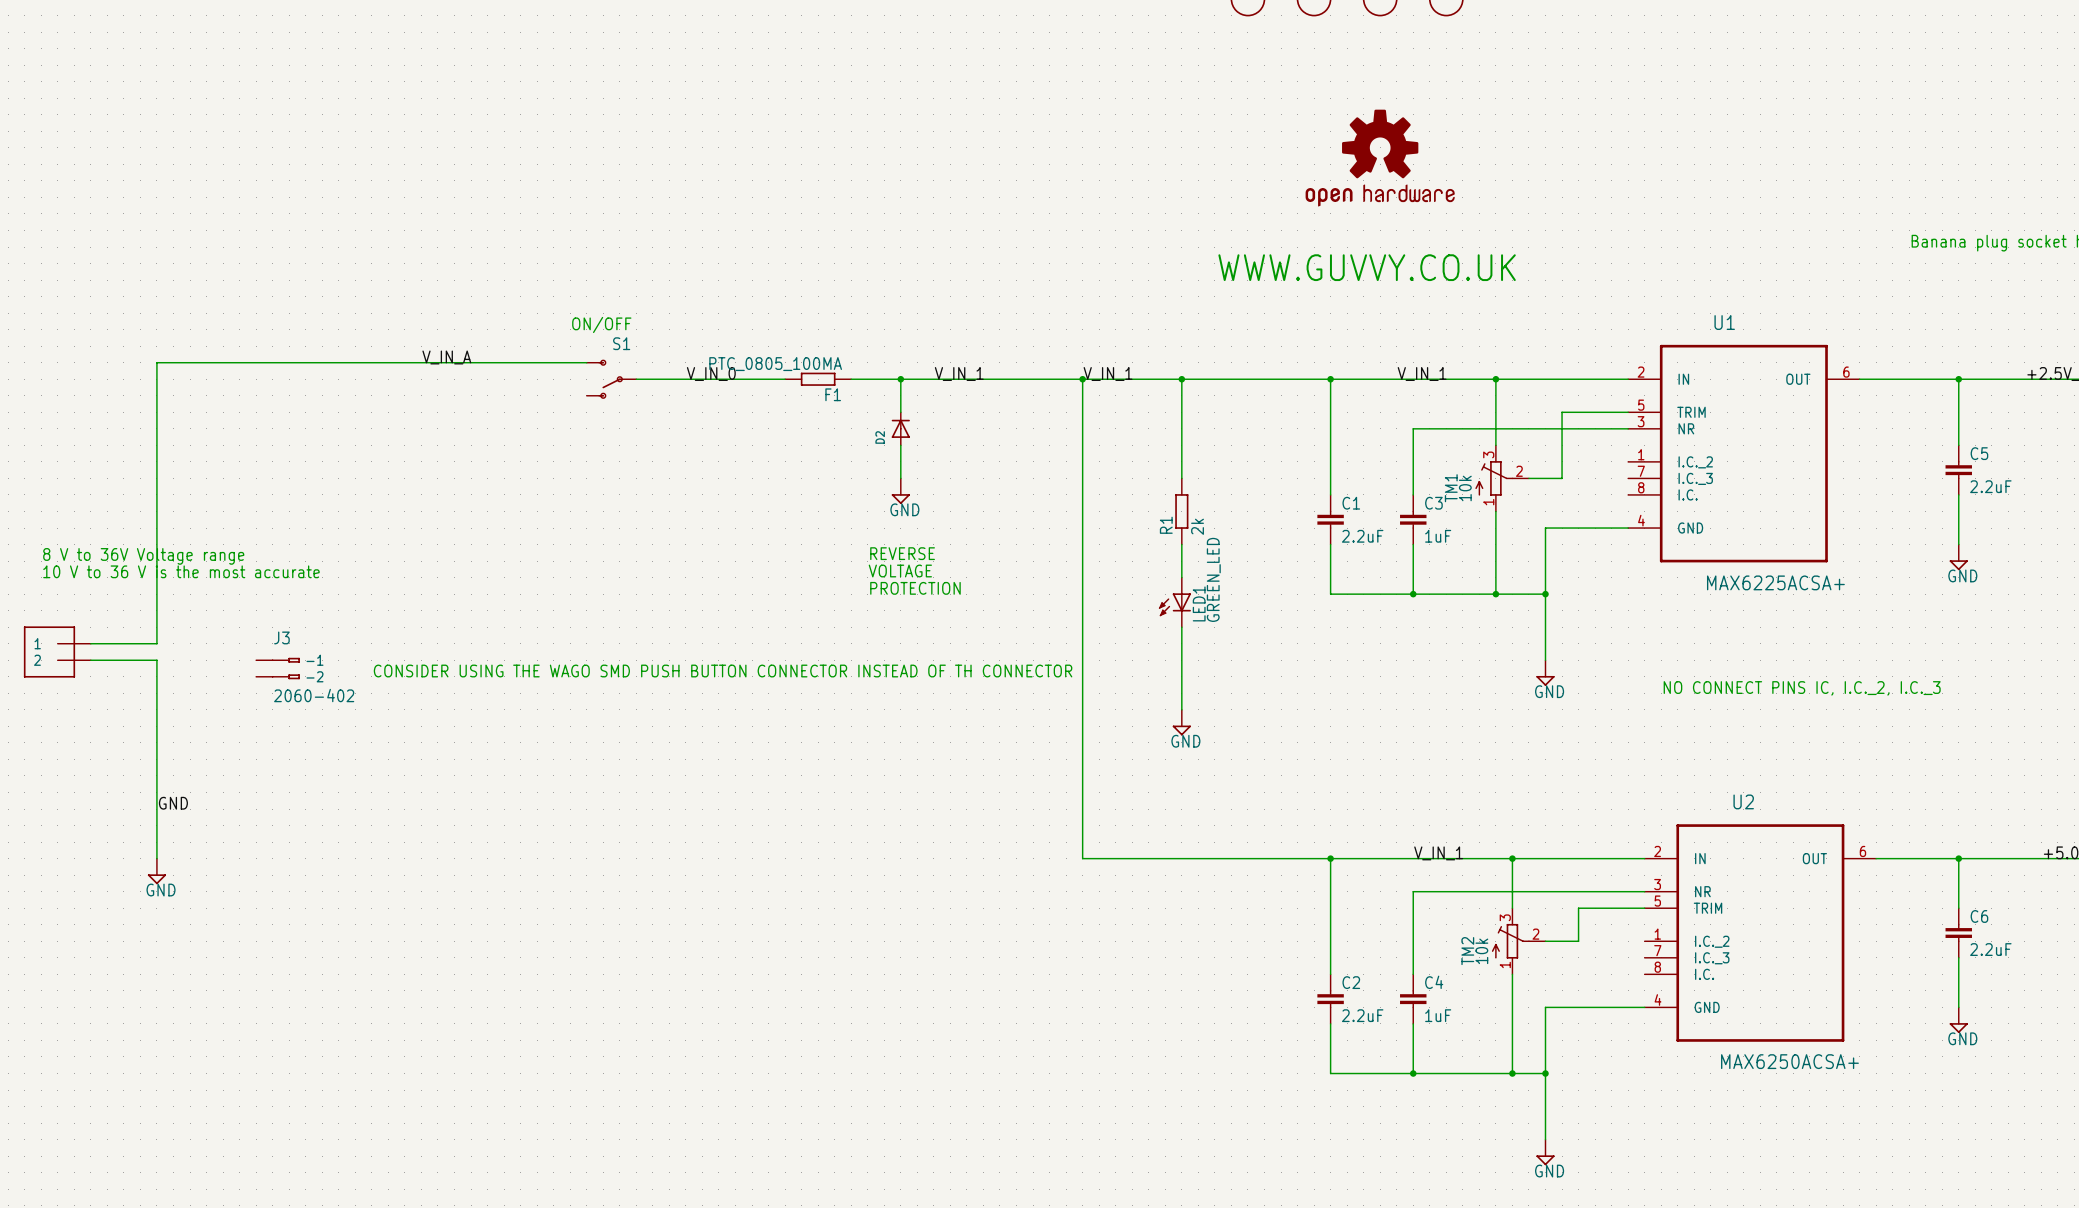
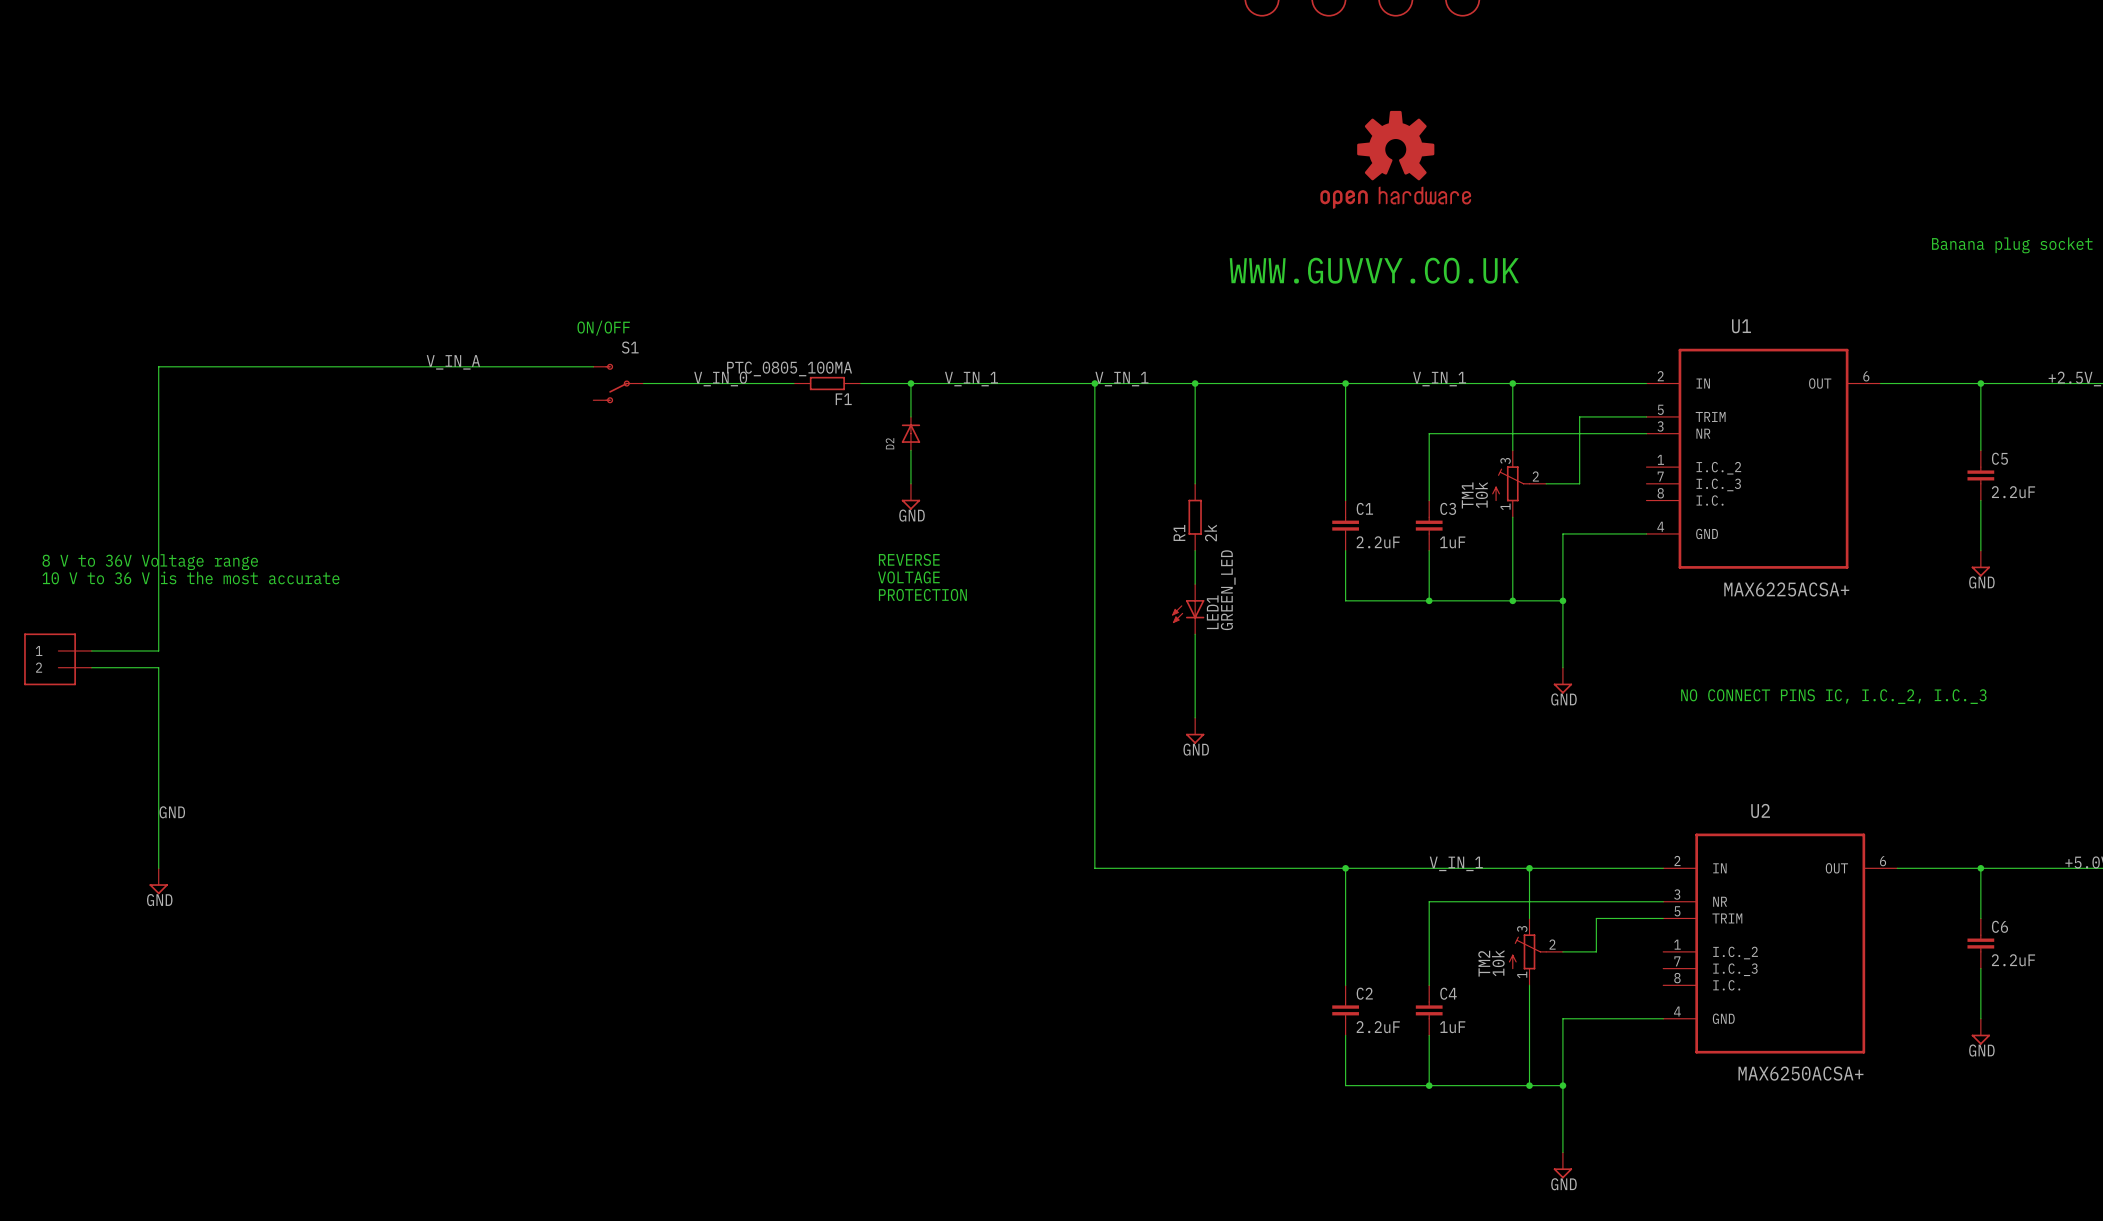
J3: 2060-402 (278, 668) -> none
text: CONSIDER USING THE WAGO SMD PUSH BUTTON CONNECTOR INSTEAD OF TH CONNECTOR (723, 671) -> none

